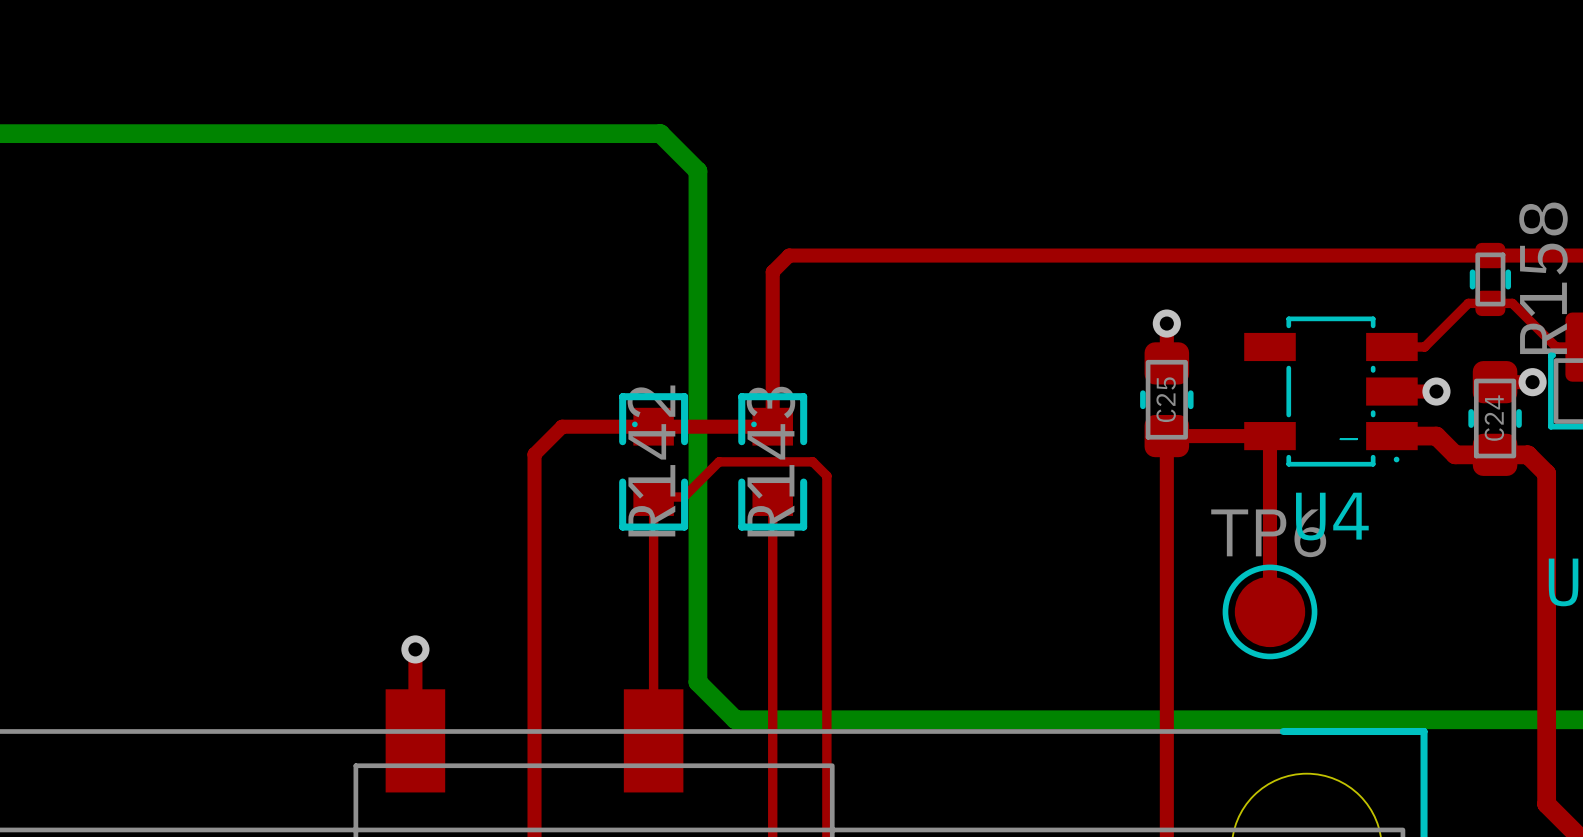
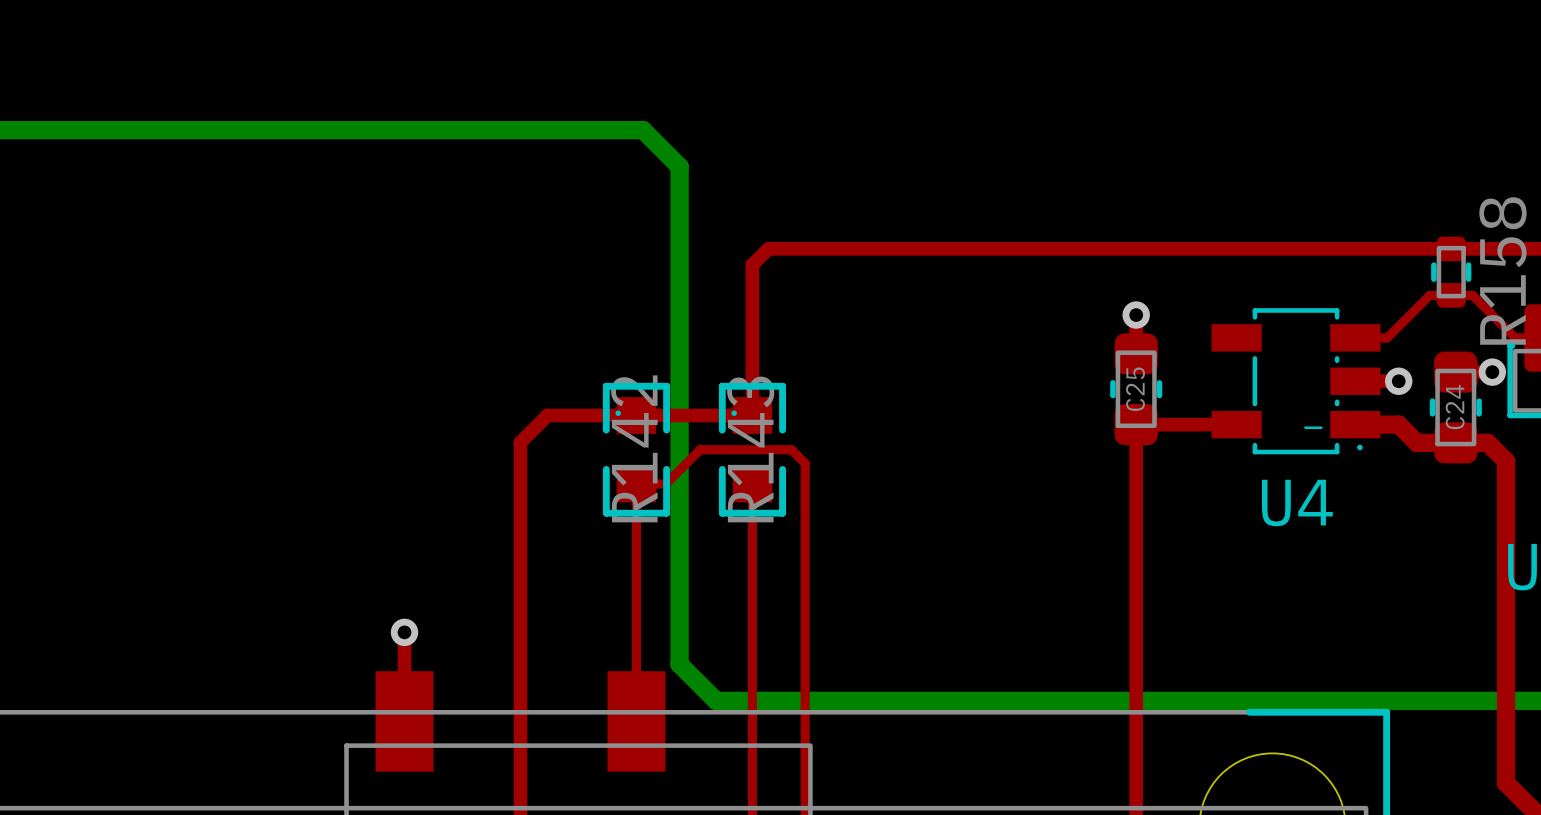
top track: (1270, 436) (1270, 611) -> none
TP6: (1270, 611) -> none

